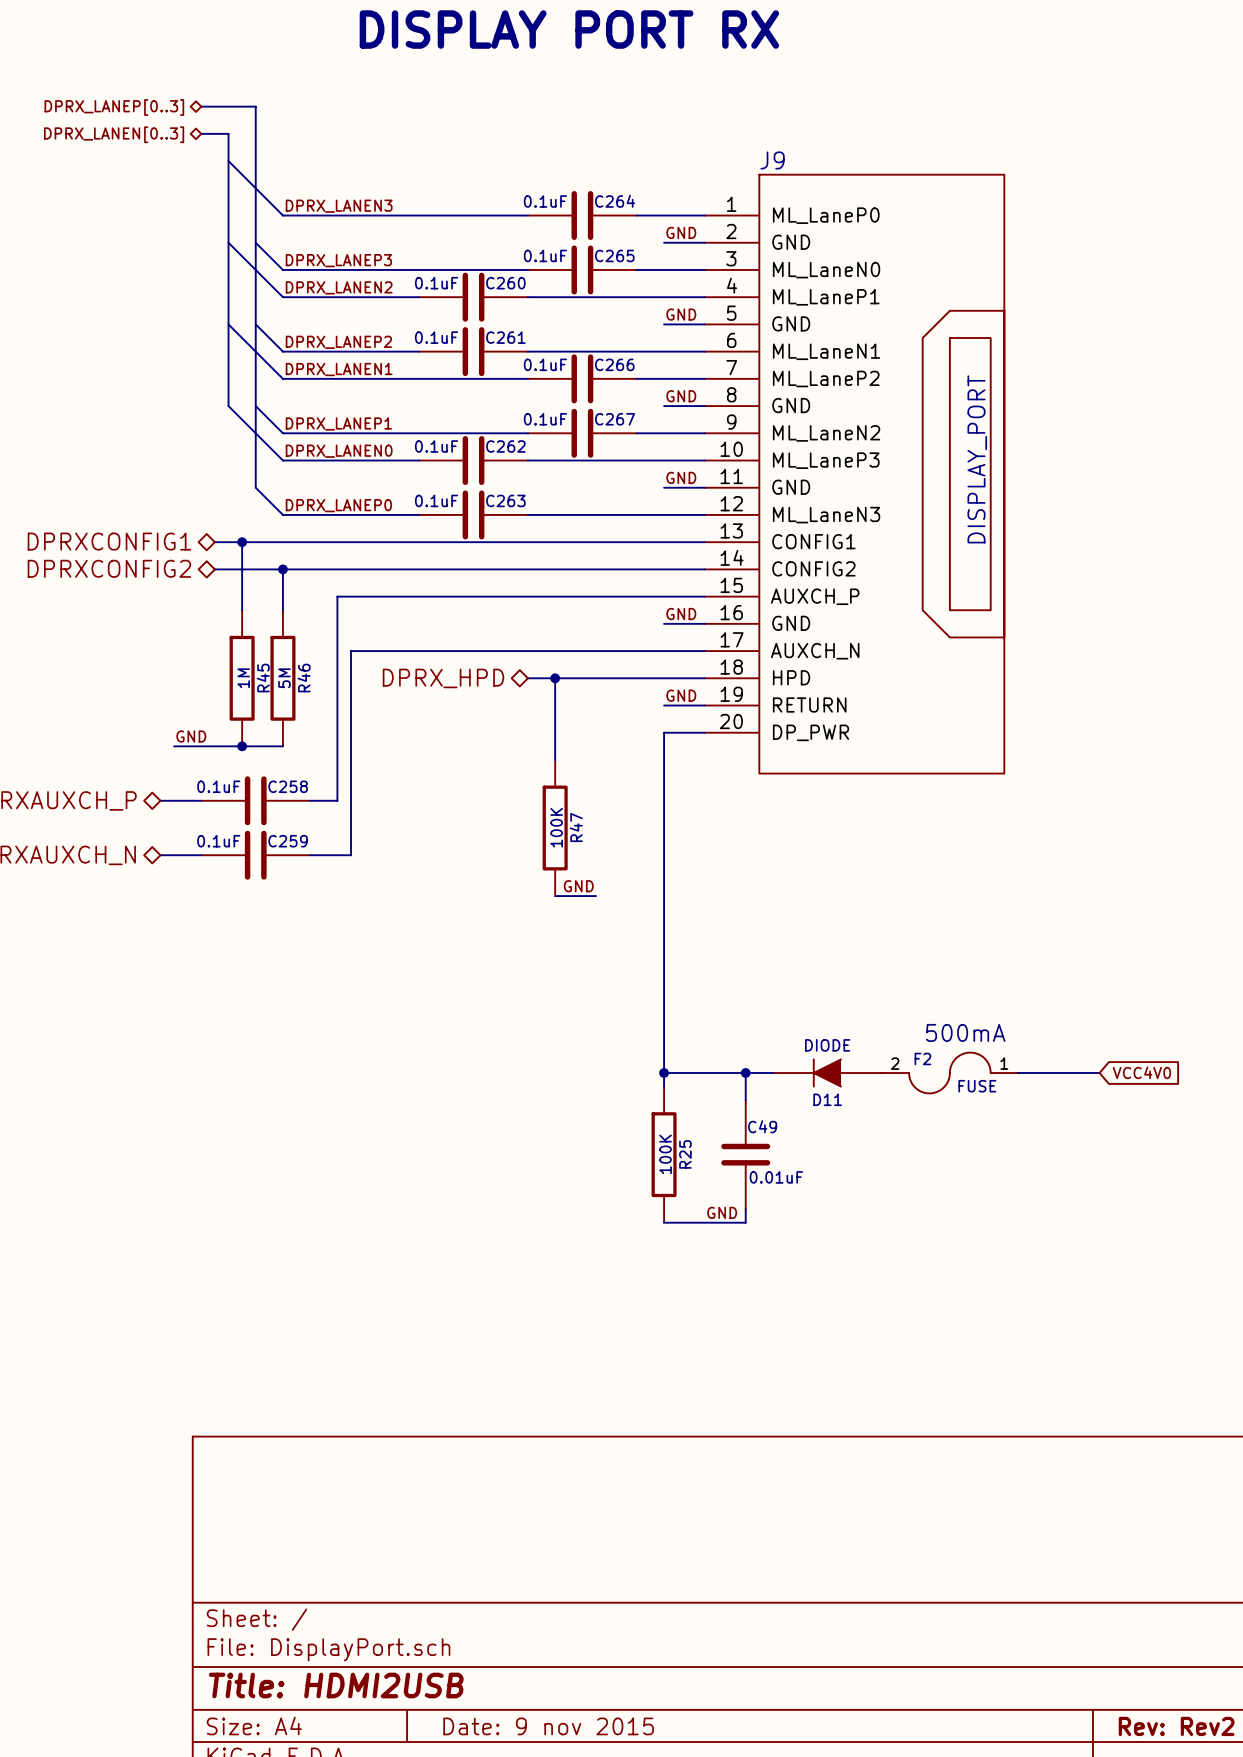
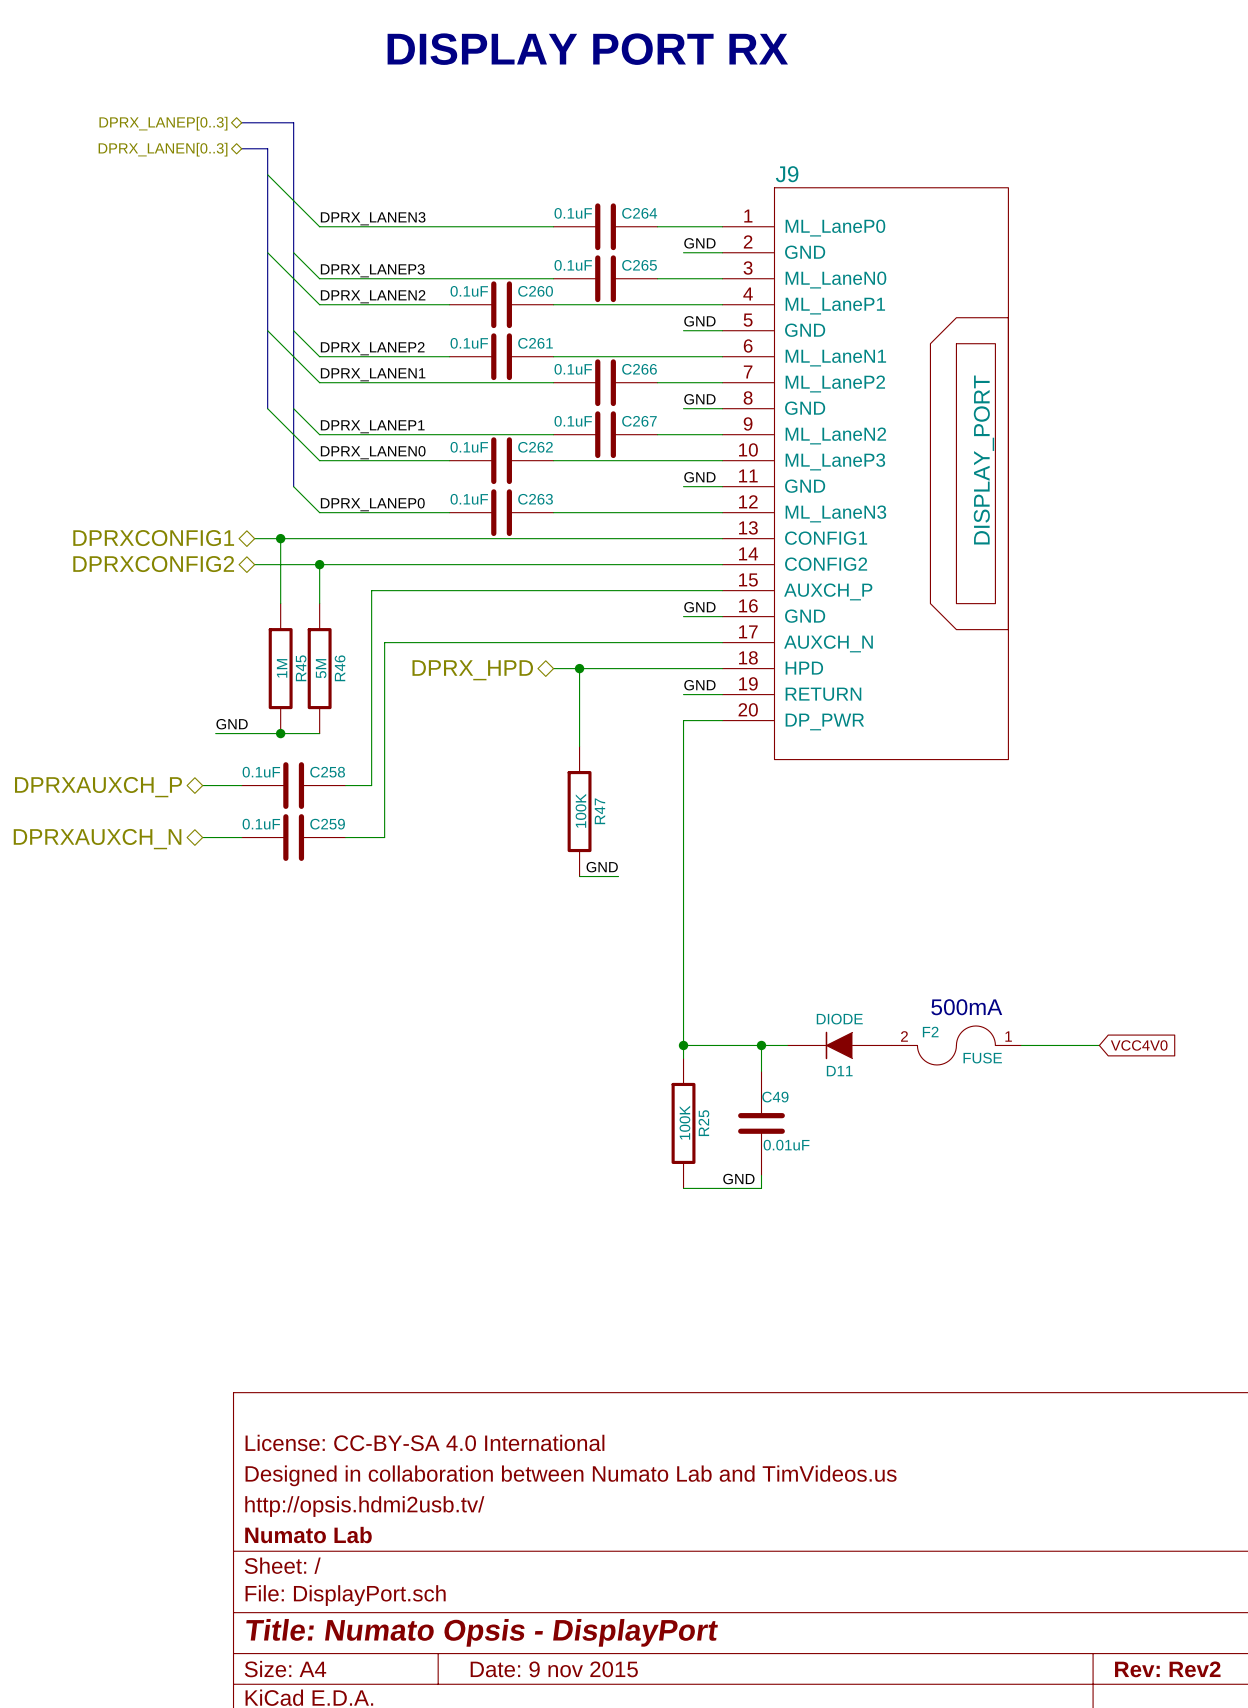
title block: none -> License: CC-BY-SA 4.0 International (424, 1442)
title block: none -> Designed in collaboration between Numato Lab and TimVideos.us (571, 1475)
title block: none -> http://opsis.hdmi2usb.tv/ (364, 1506)
title block: none -> Numato Lab (308, 1535)
title block: Title: HDMI2USB (336, 1685) -> Title: Numato Opsis - DisplayPort (482, 1632)

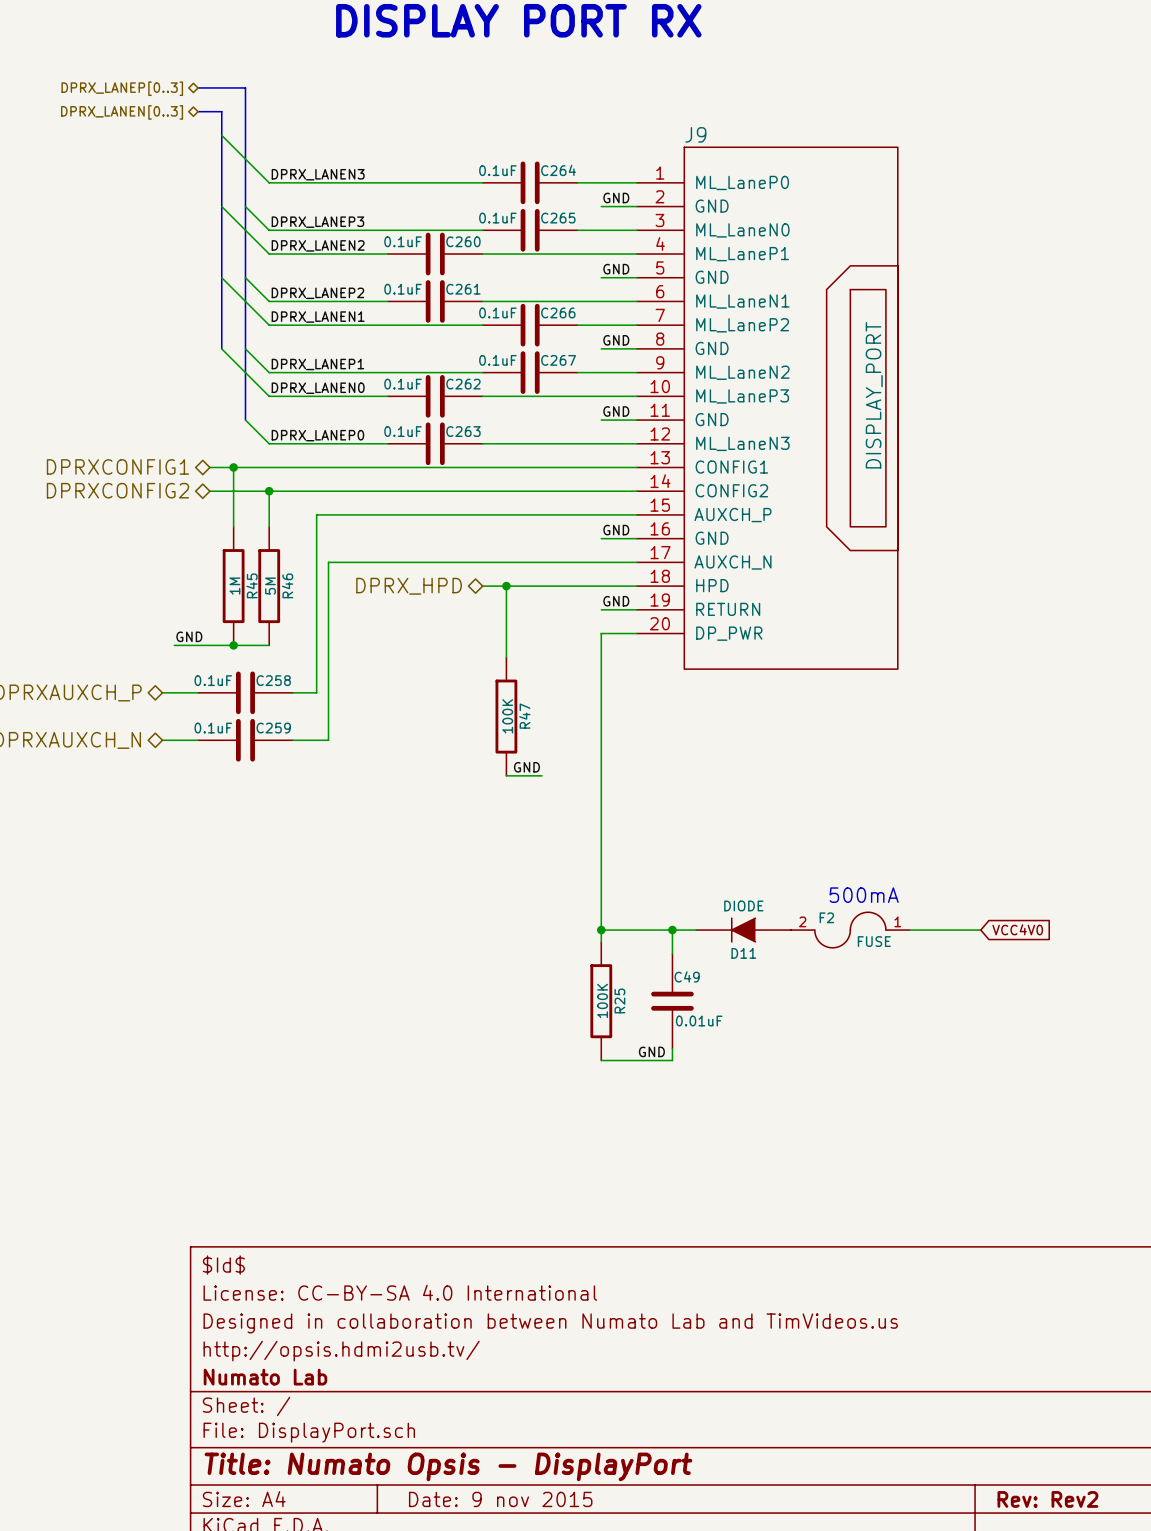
title block: none -> $Id$ (223, 1265)

